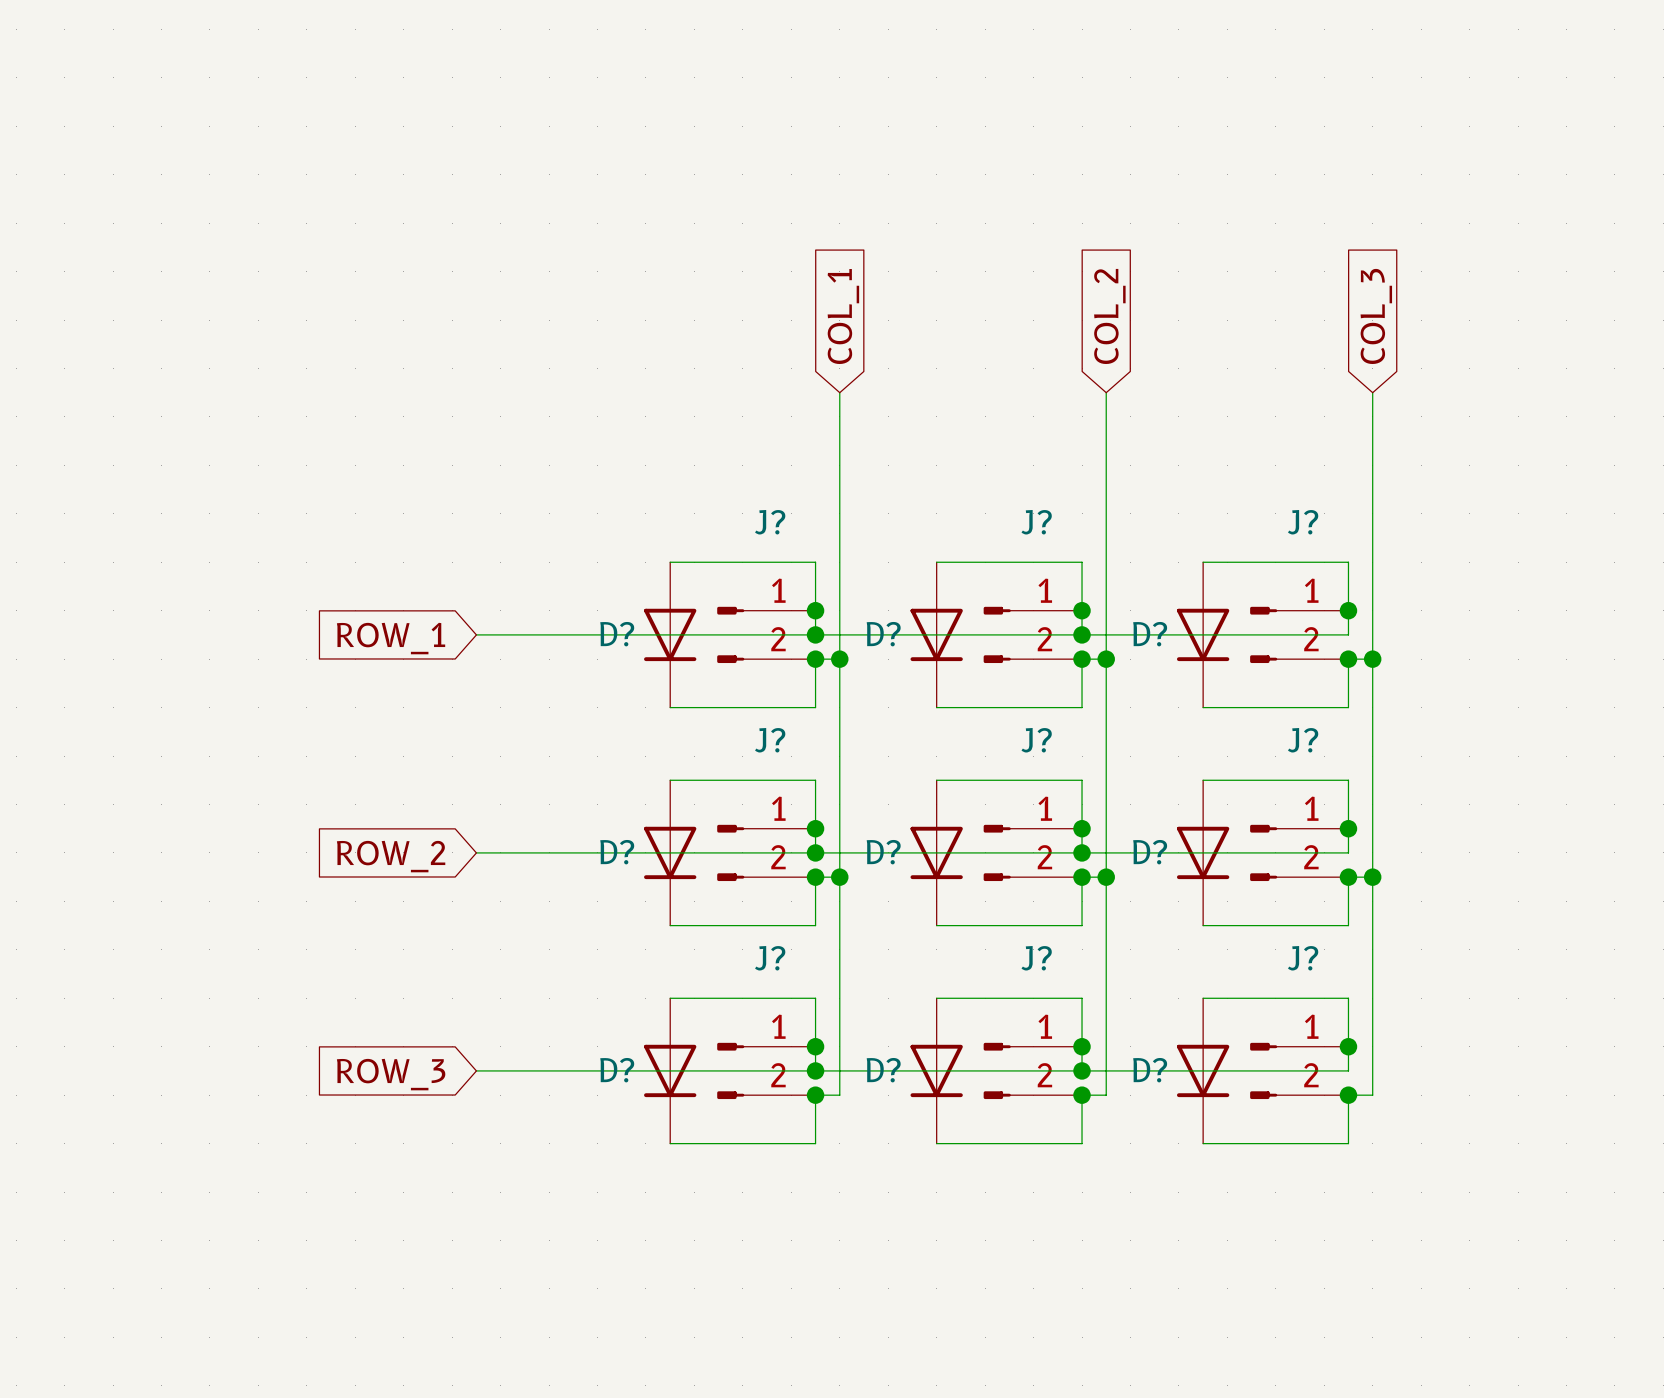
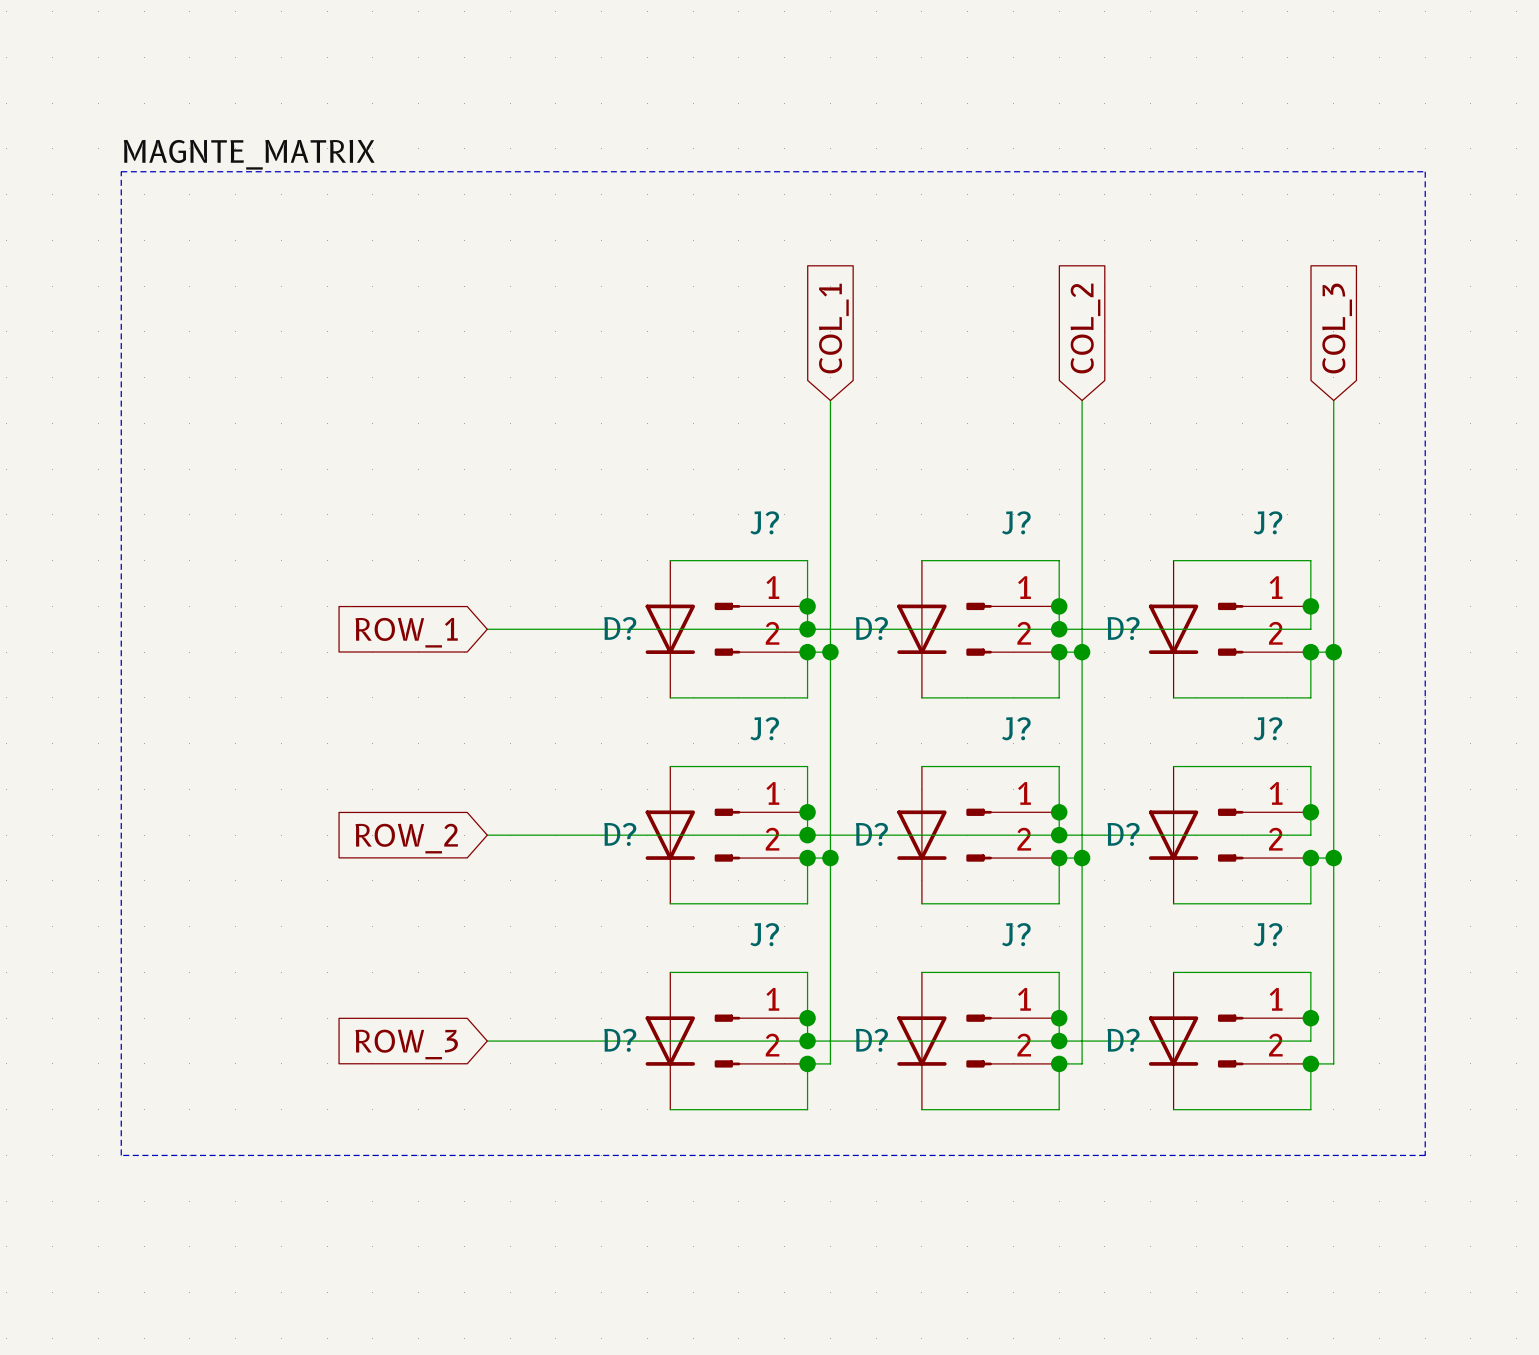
label: none -> MAGNTE_MATRIX (249, 154)
line: none -> (121, 171) (121, 1155) (1425, 1155) (1425, 171) (121, 171)

